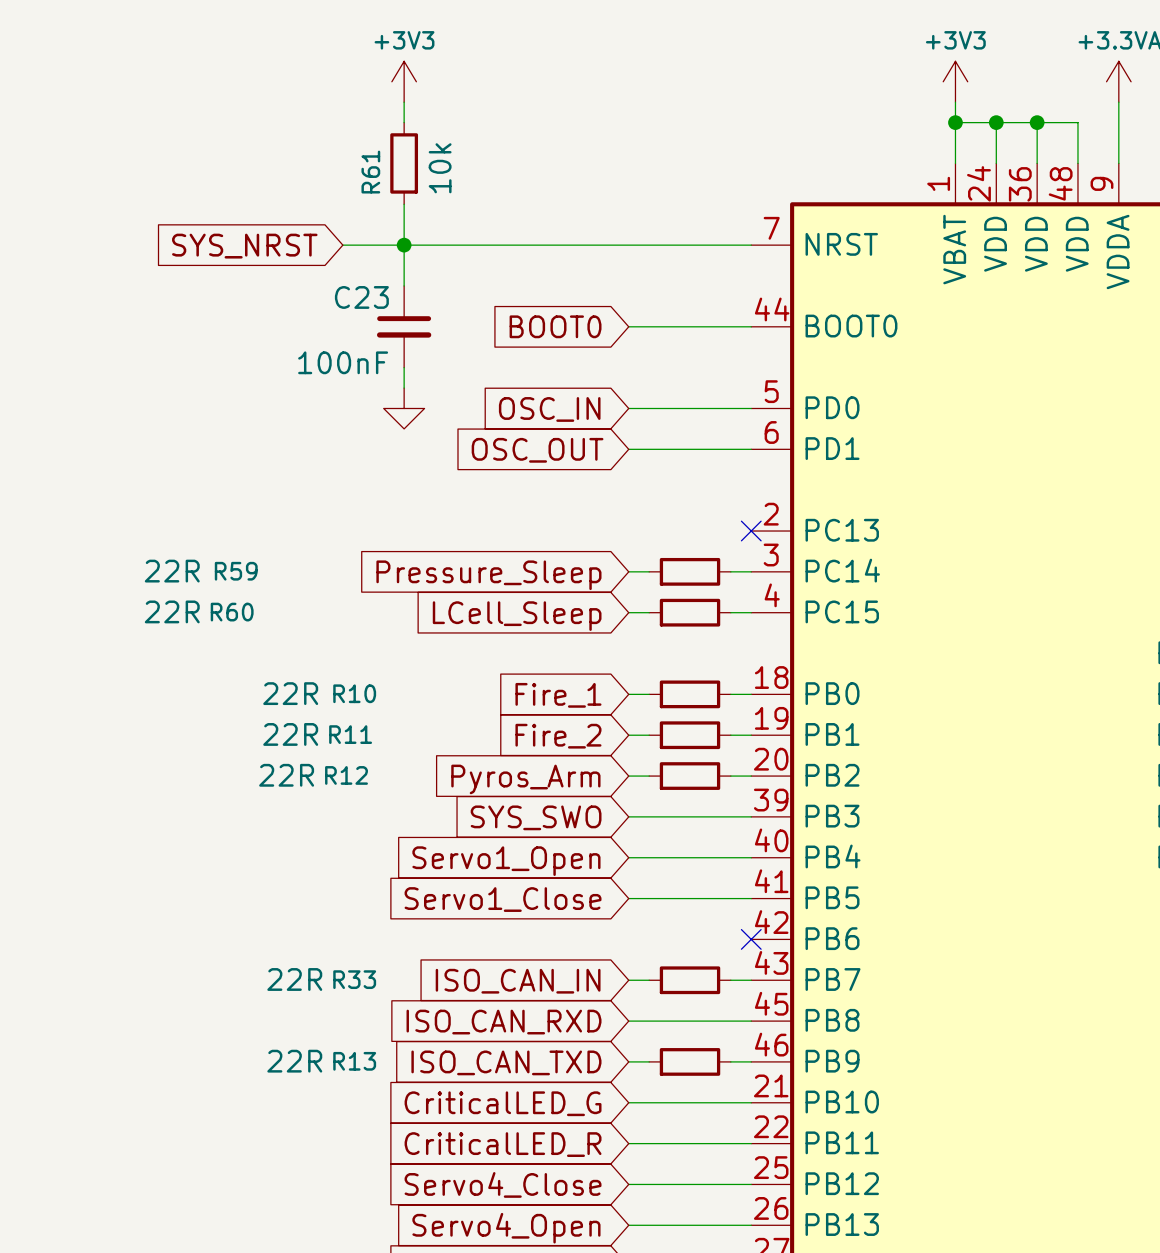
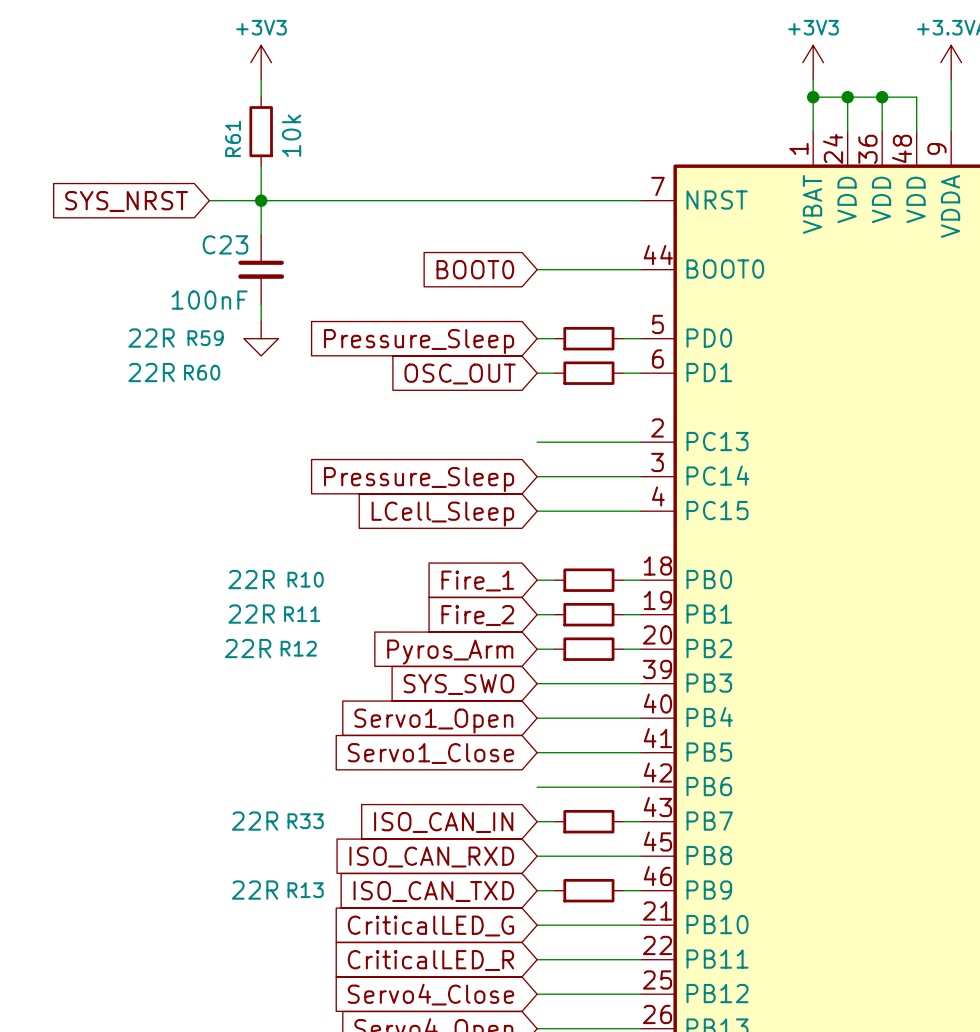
power symbol position: +3V3 (404, 81) -> +3V3 (261, 62)
wire: (404, 102) (404, 122) -> (261, 79) (261, 97)
R61 position: (404, 163) -> (261, 131)
wire: (404, 204) (404, 285) -> (261, 166) (261, 235)
wire: none -> (209, 200) (295, 200)
junction: none -> (261, 200)
junction: (404, 245) -> none
global label position: SYS_NRST (244, 246) -> SYS_NRST (126, 201)
C23 position: (404, 326) -> (261, 269)
wire: (404, 367) (404, 388) -> (261, 304) (261, 321)
power symbol position: (404, 408) -> (261, 338)
wire: (649, 408) (730, 408) -> (554, 476) (623, 476)
global label: OSC_IN (549, 409) -> Pressure_Sleep (419, 341)
wire: (649, 449) (730, 449) -> (554, 511) (623, 511)
wire: none -> (537, 442) (640, 442)
no-connect mark: (751, 531) -> none
R59 position: (690, 571) -> (588, 338)
R60 position: (690, 612) -> (588, 373)
wire: none -> (537, 787) (640, 787)
no-connect mark: (751, 939) -> none

